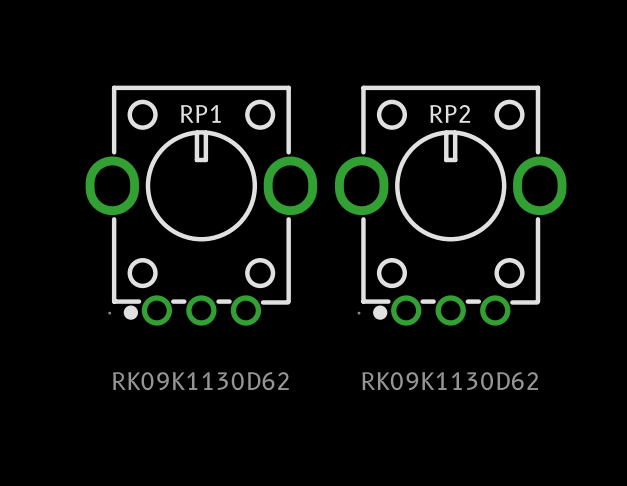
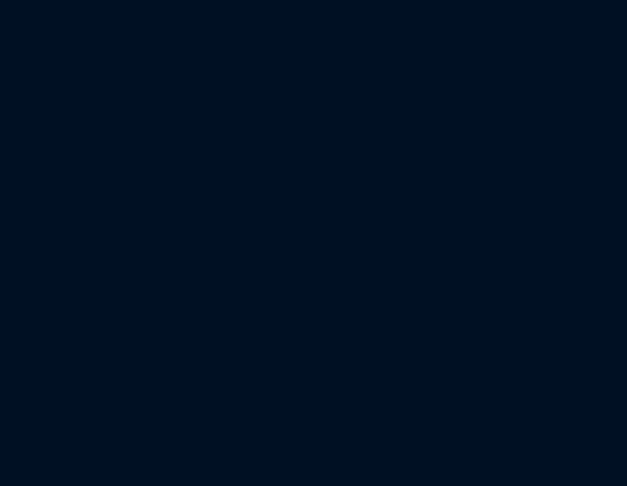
RP1: RK09K1130D62 (201, 205) -> none
RP2: RK09K1130D62 (450, 205) -> none

